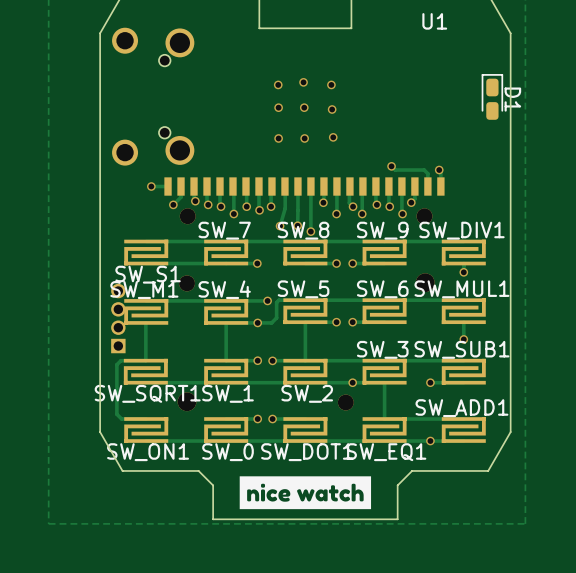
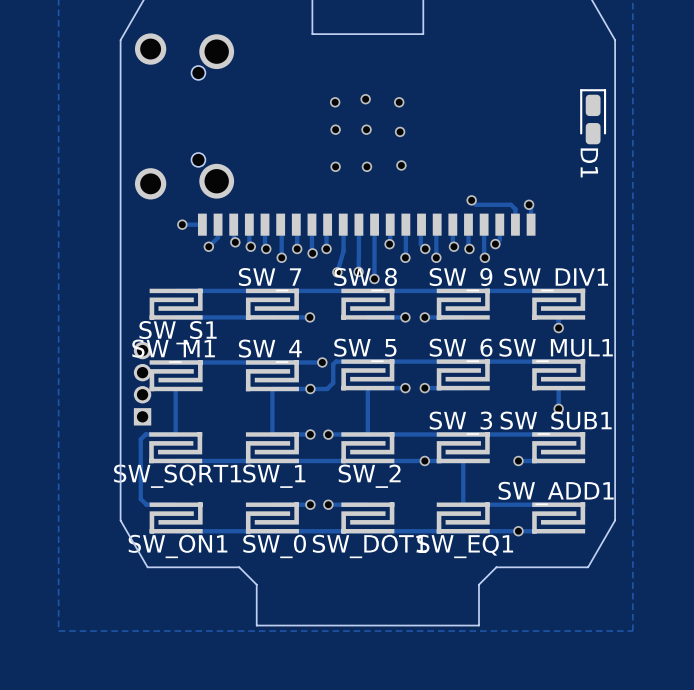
U1 name: U1 (434, 21) -> none
D1 name position: D1 (512, 99) -> D1 (589, 162)
part: (187, 216) -> none
part: (424, 216) -> none
part: (425, 282) -> none
part: (186, 283) -> none
part: (186, 401) -> none
part: (345, 402) -> none
drawing: [239, 476, 372, 510] -> none

